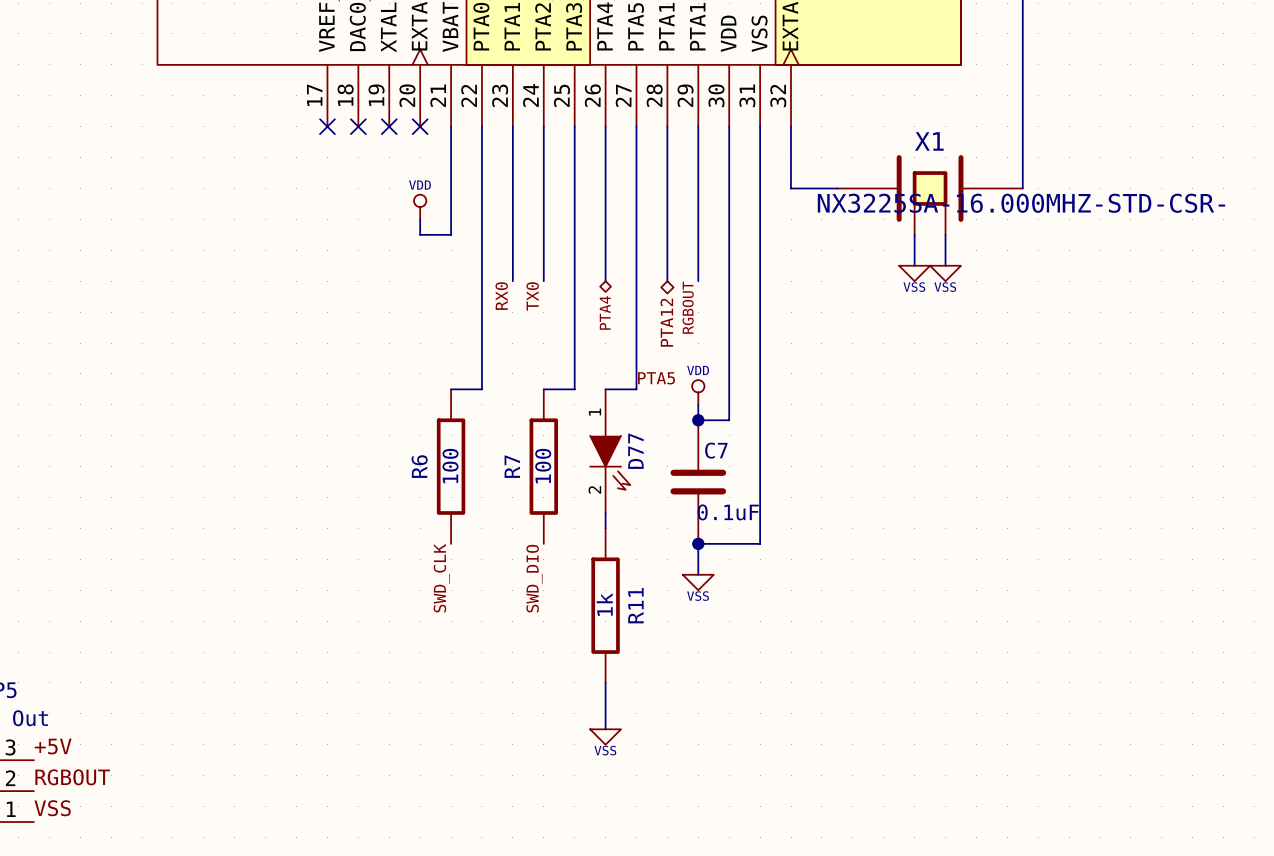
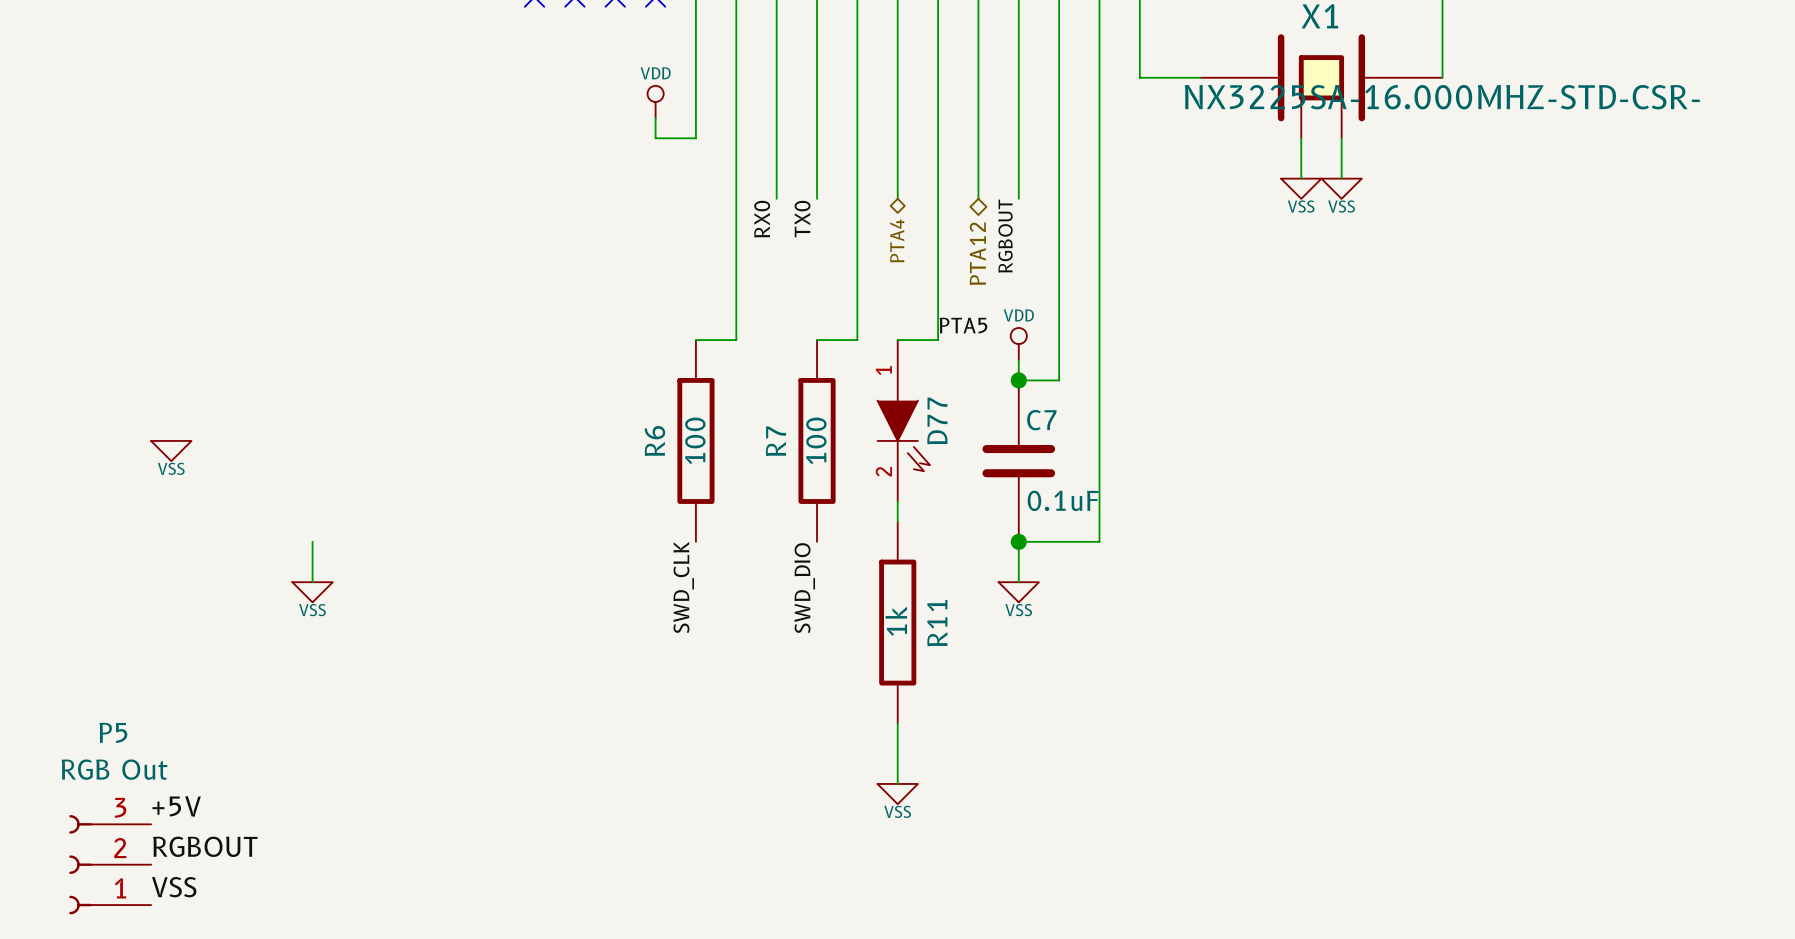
power symbol: none -> VSS (171, 451)
wire: none -> (312, 541) (312, 582)
power symbol: none -> VSS (312, 592)

